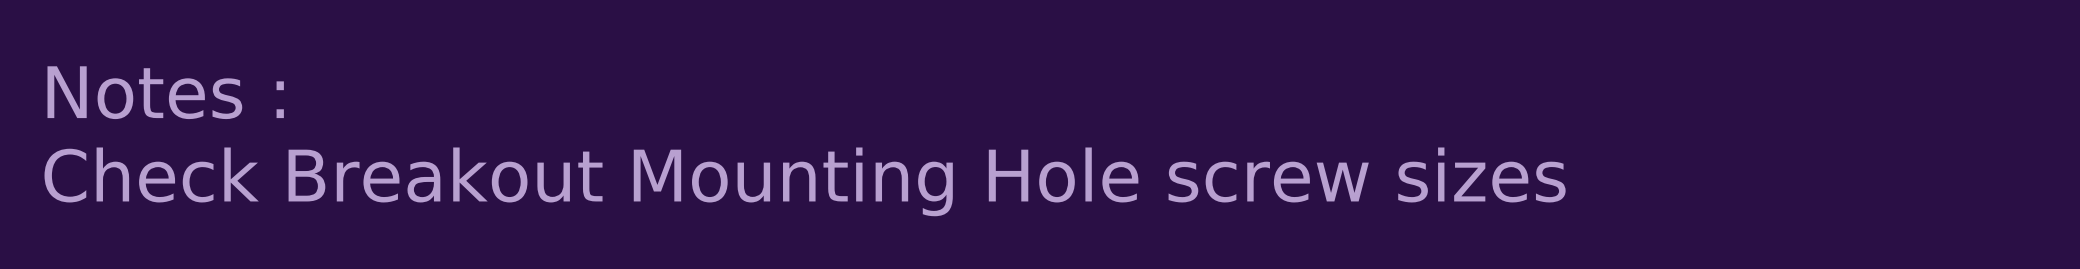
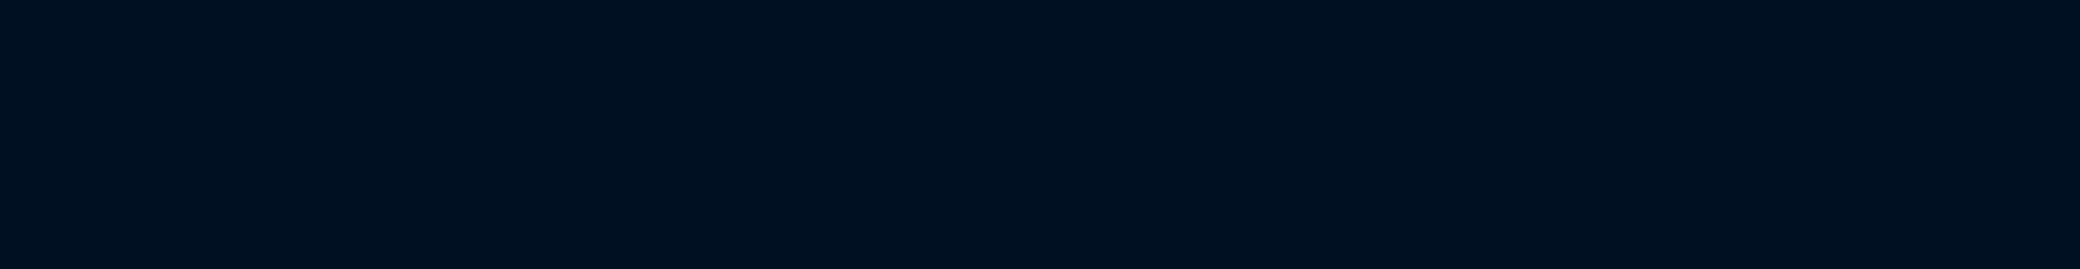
text: Notes : (165, 92) -> none
text: Check Breakout Mounting Hole screw sizes (805, 181) -> none

